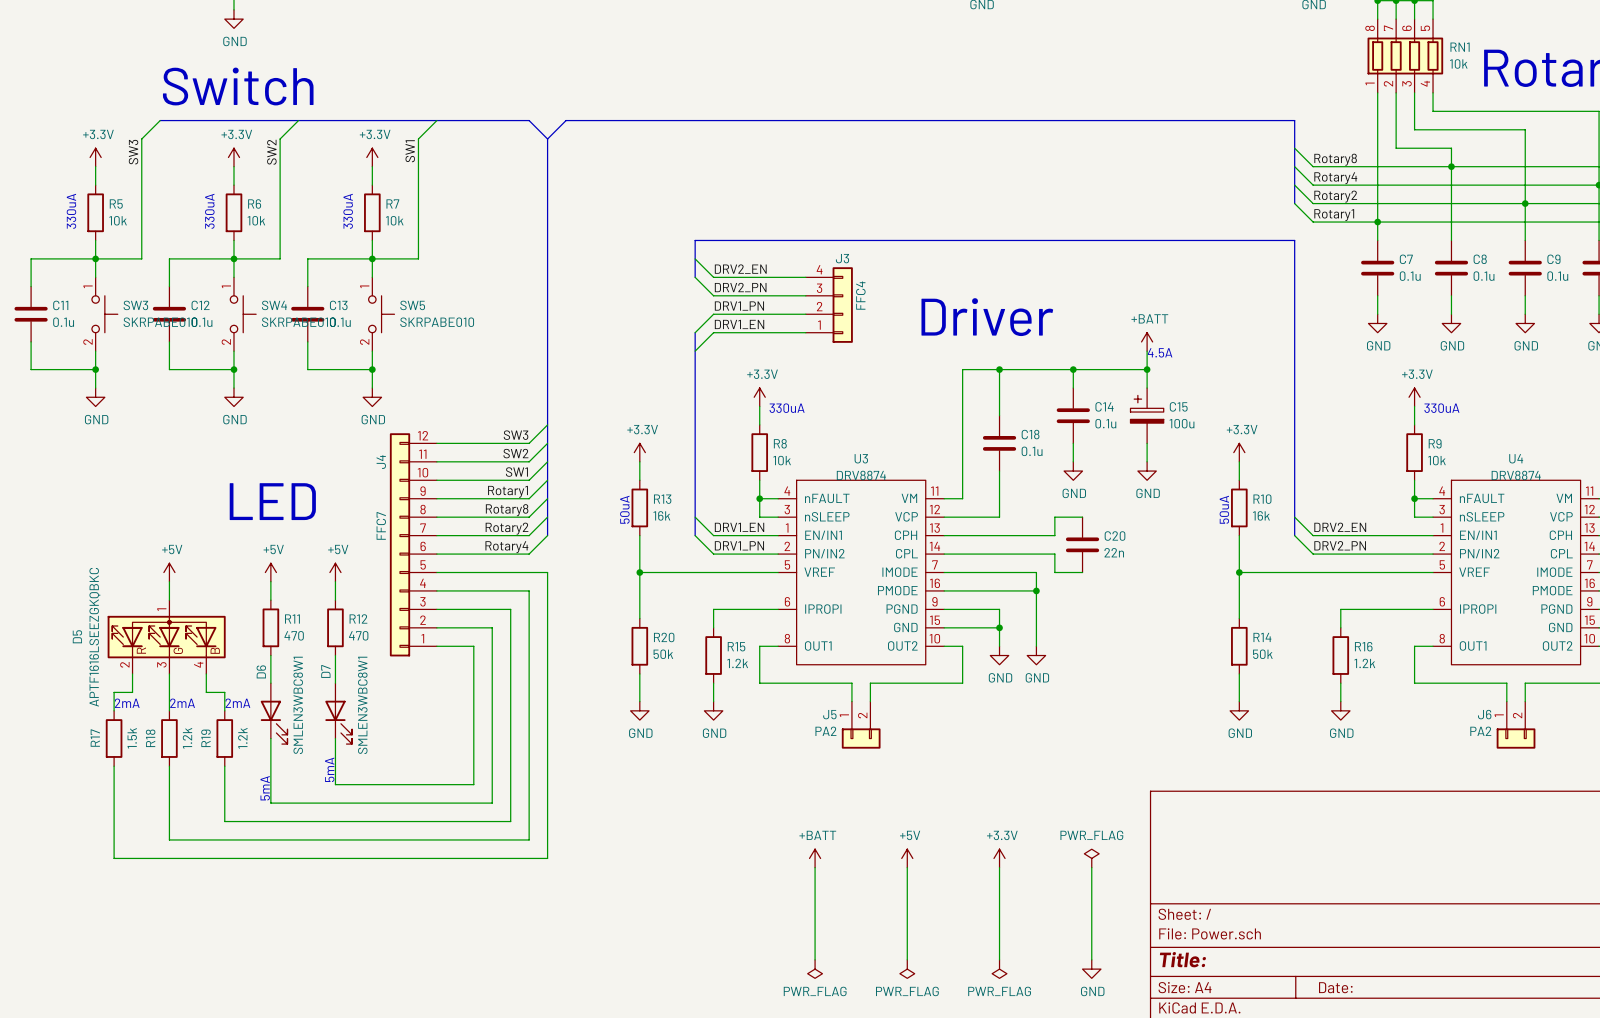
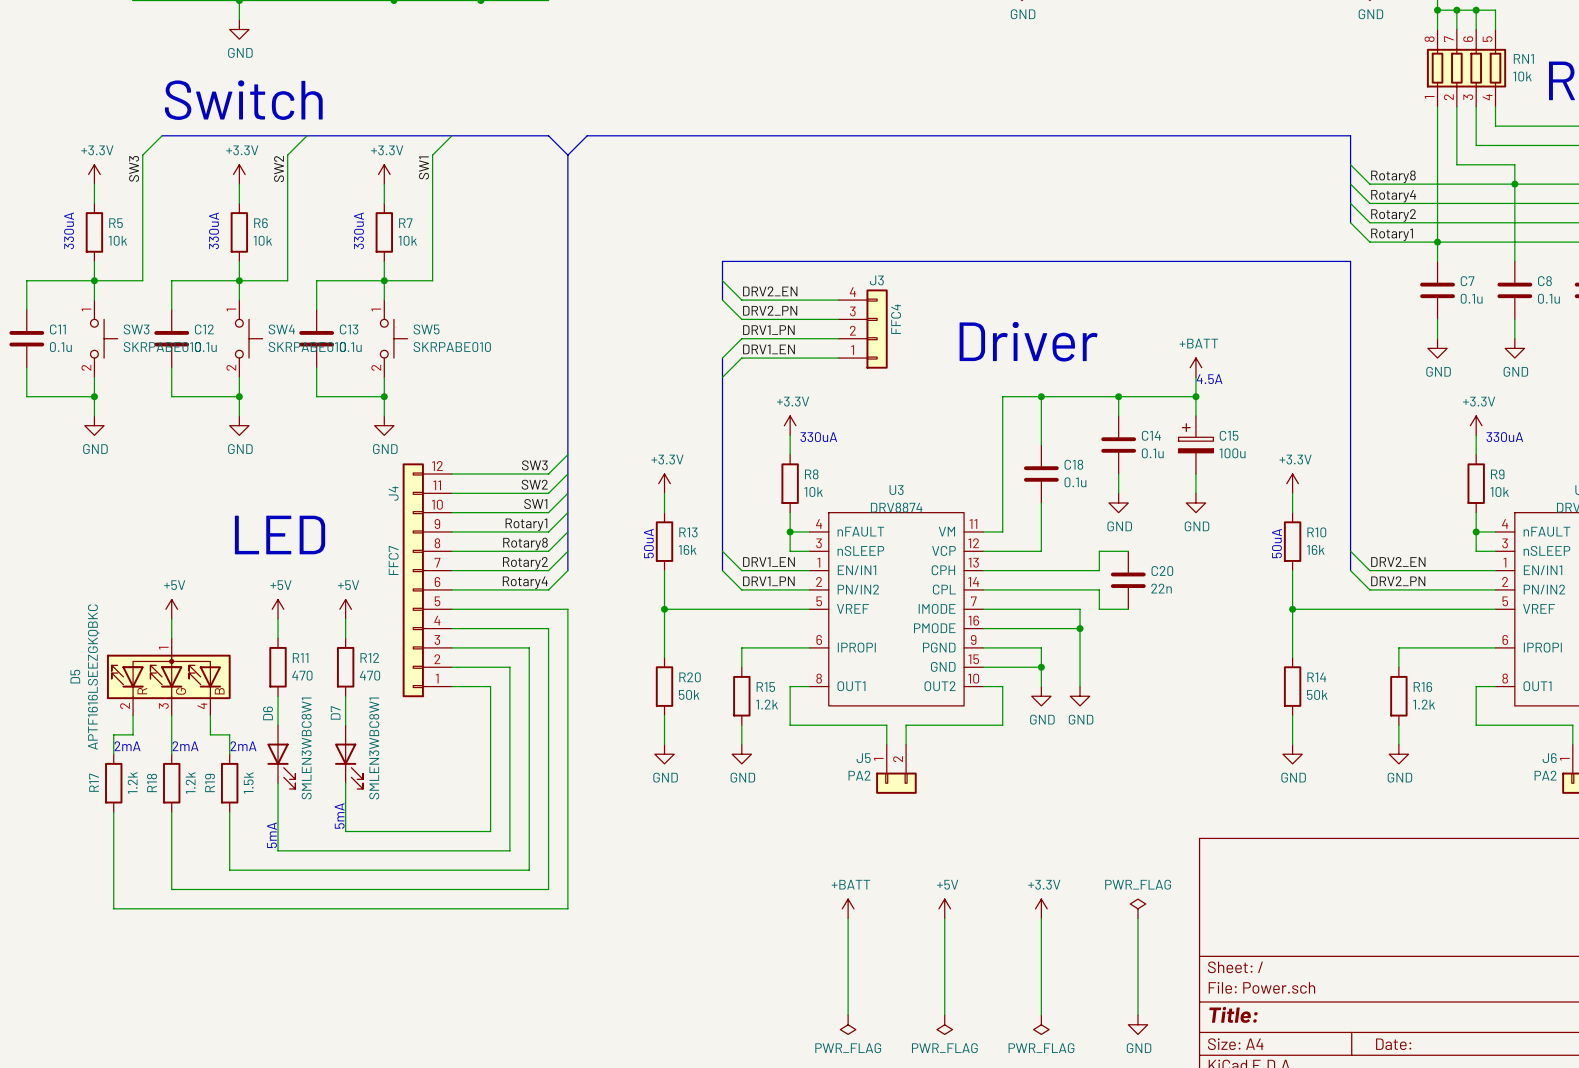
R17 value: 1.5k (132, 738) -> 1.2k (132, 783)
R19 value: 1.2k (242, 738) -> 1.5k (248, 783)

